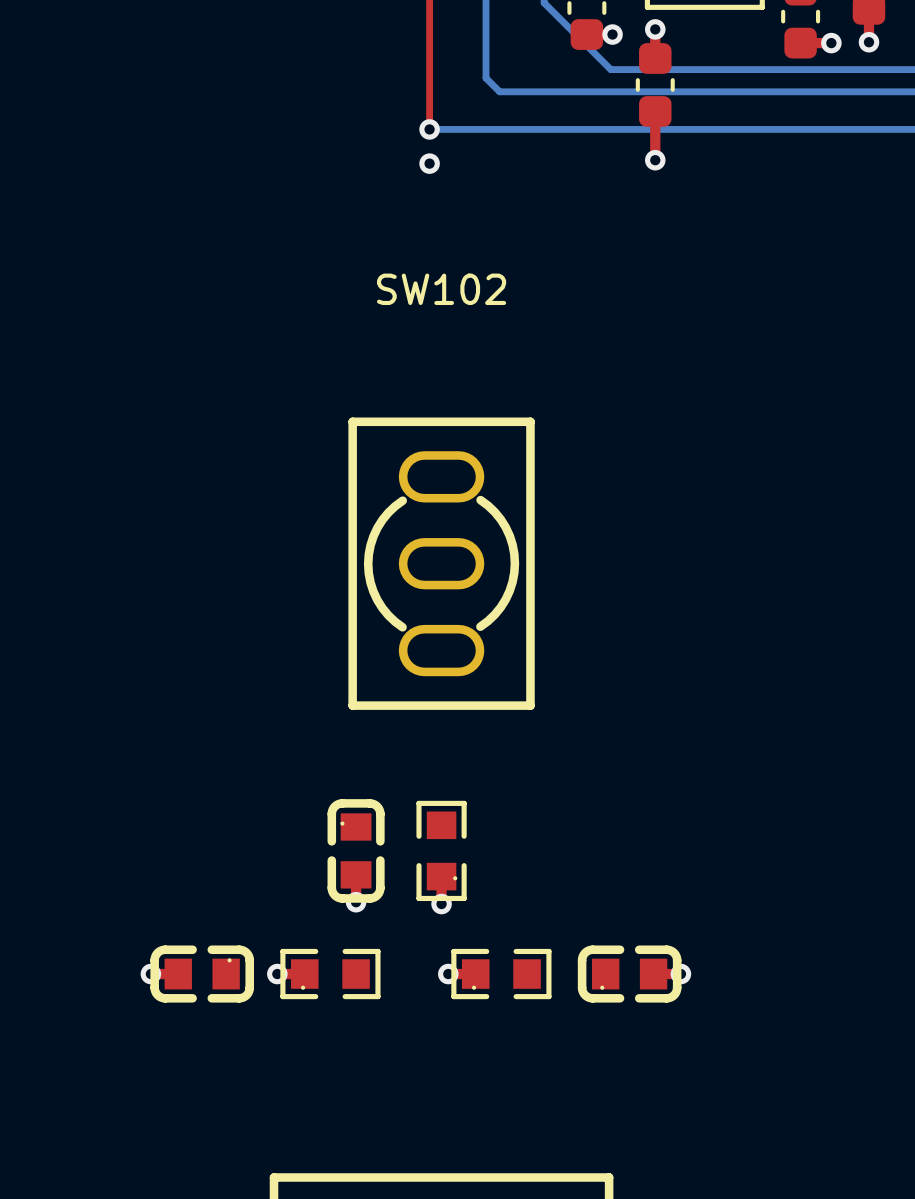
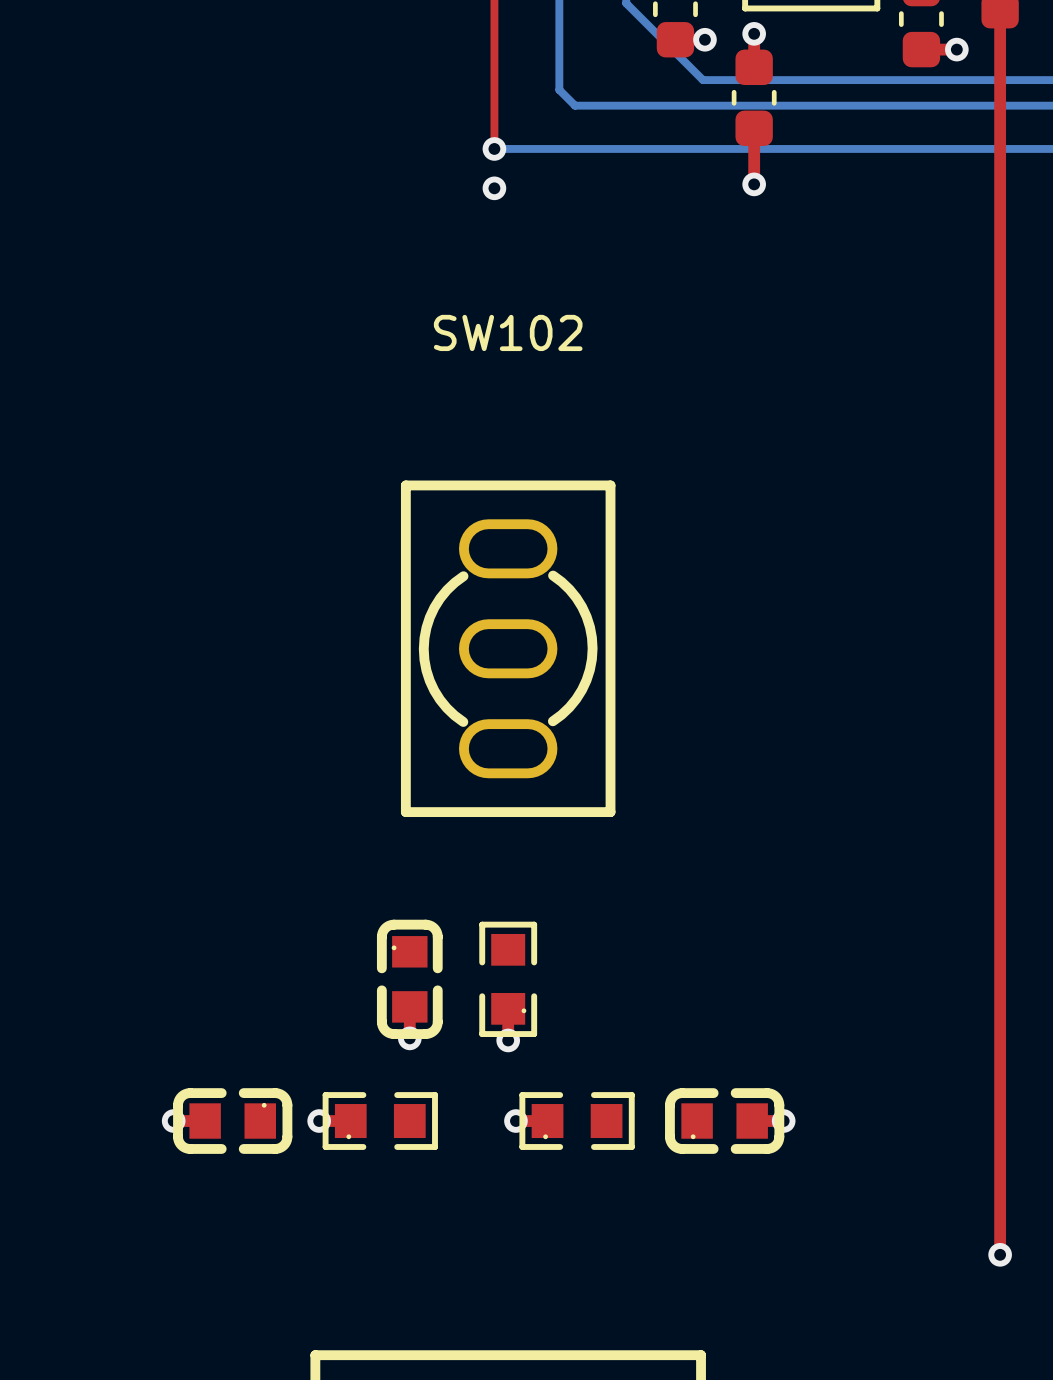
top track: none -> (1000, 48) (1000, 1254)
via: (868, 42) -> none
via: none -> (1000, 1254)

